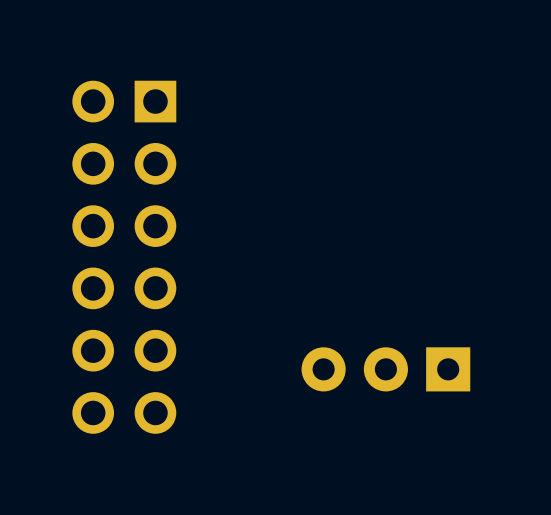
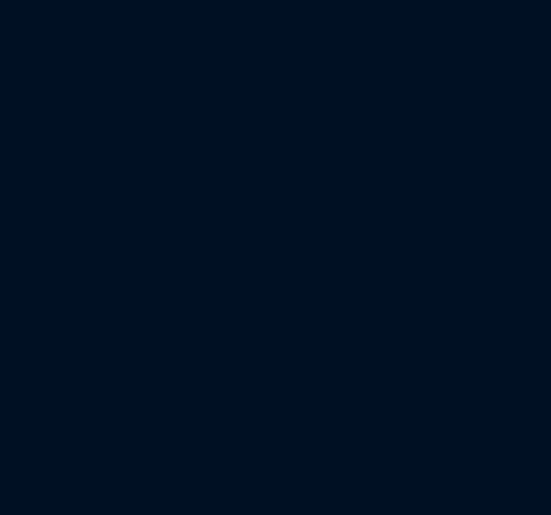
part: (124, 257) -> none
part: (385, 369) -> none

